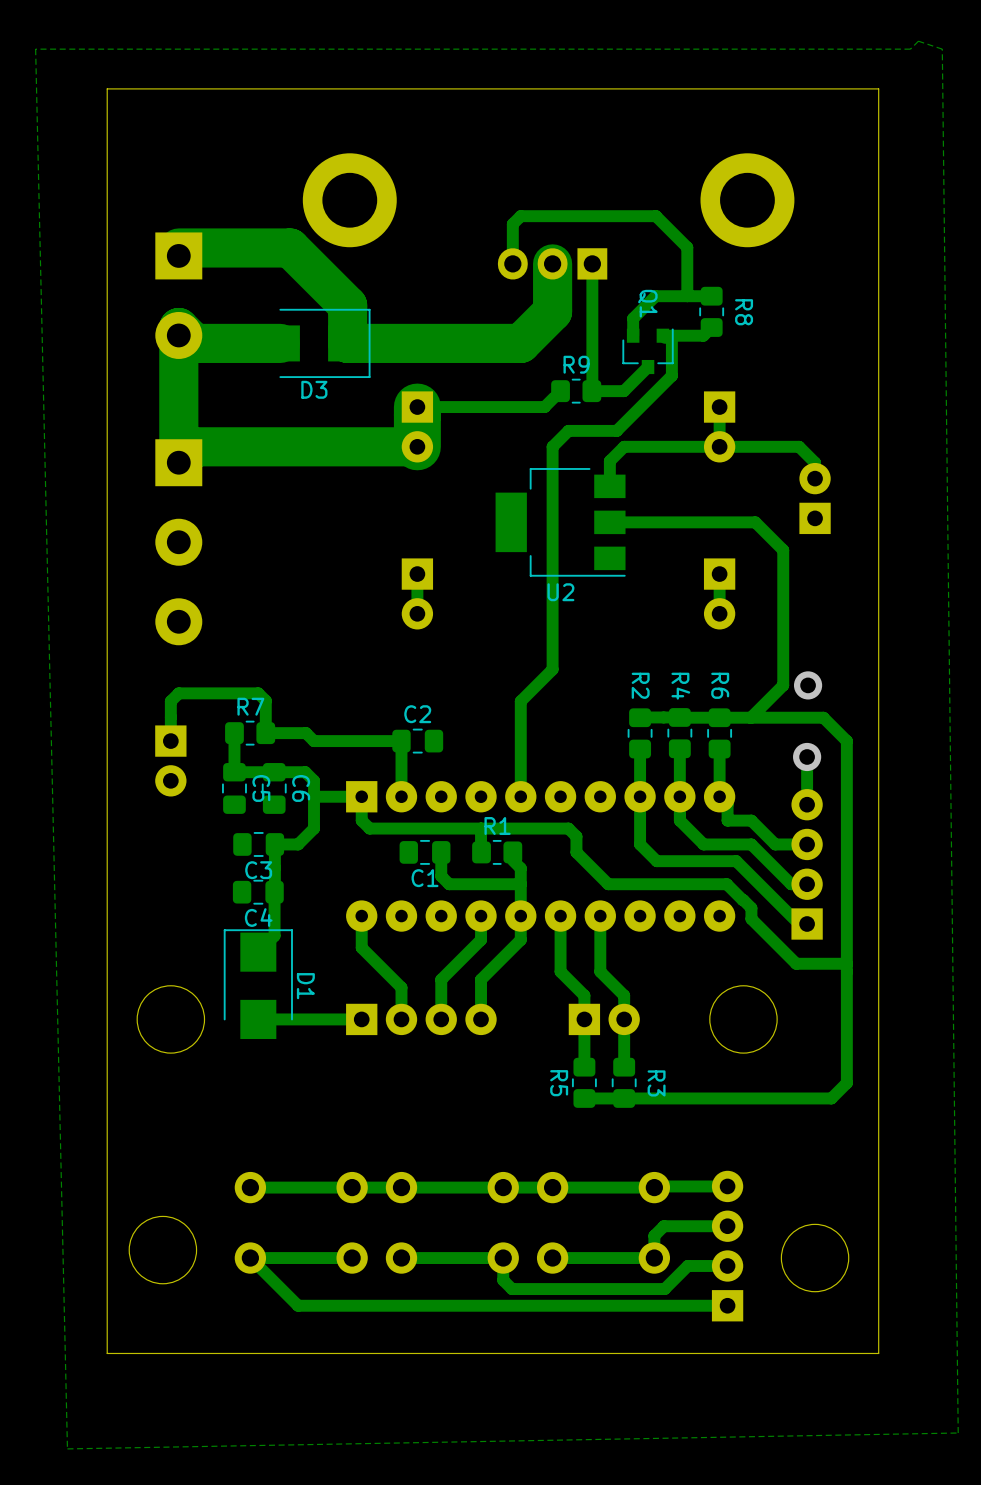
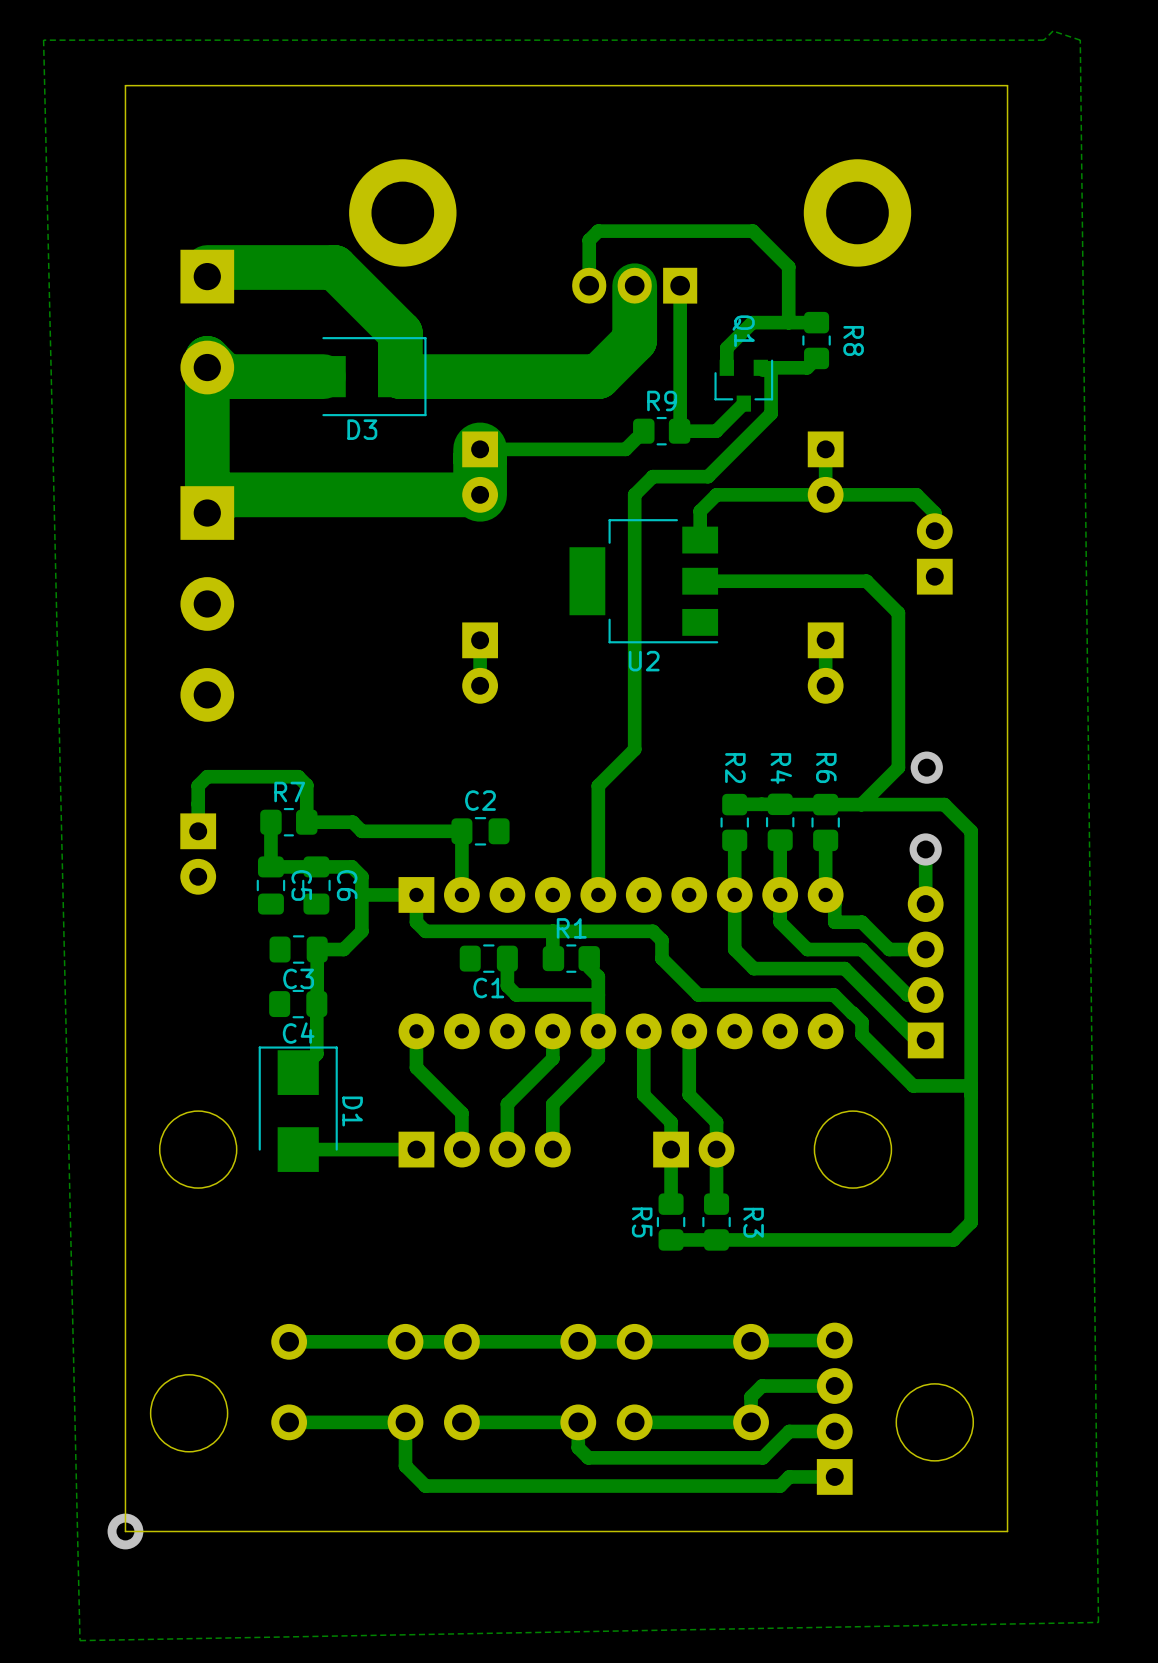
track: (250, 1258) (298, 1305) (687, 1305) -> (405, 1422) (405, 1465) (425, 1486) (780, 1486) (789, 1476)
via: none -> (125, 1531)

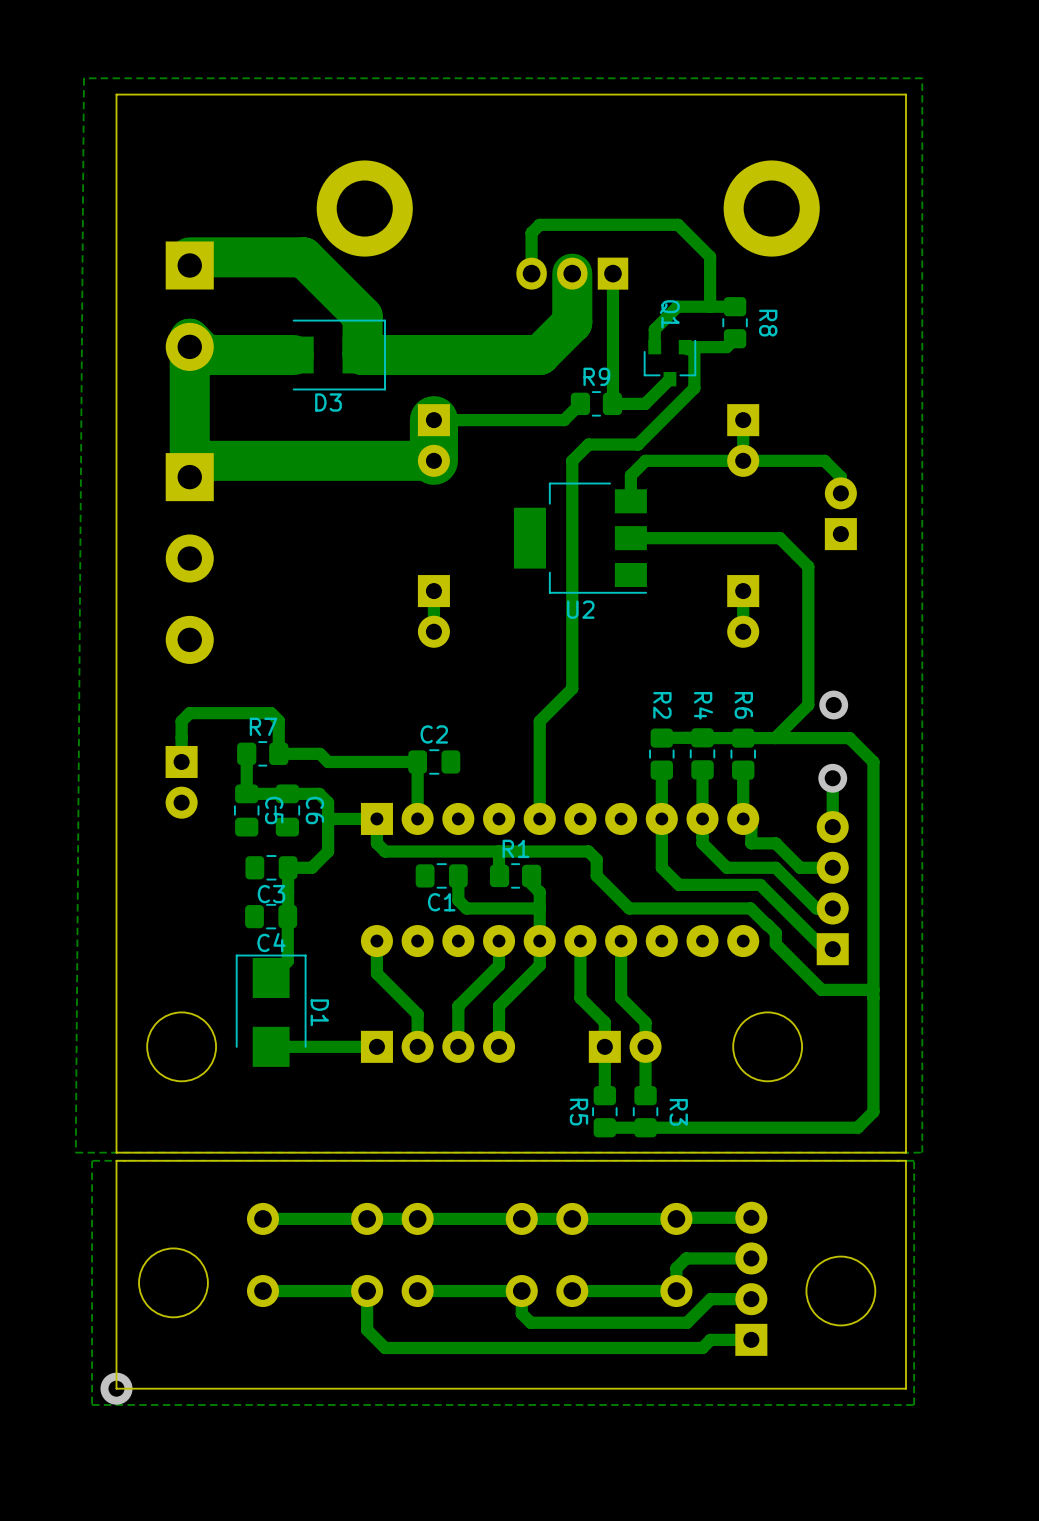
zone outline: (1052, 31) (1080, 40) (1098, 1622) (79, 1640) (43, 40) (1043, 40) (1052, 31) -> (922, 78) (922, 1152) (75, 1152) (83, 78) (922, 78)
board edge: (125, 1267) (125, 1276) -> (905, 1160) (116, 1160)
board edge: (1007, 1267) (1007, 1276) -> (905, 1152) (116, 1152)
zone outline: none -> (914, 1160) (914, 1404) (92, 1404) (92, 1160) (914, 1160)

